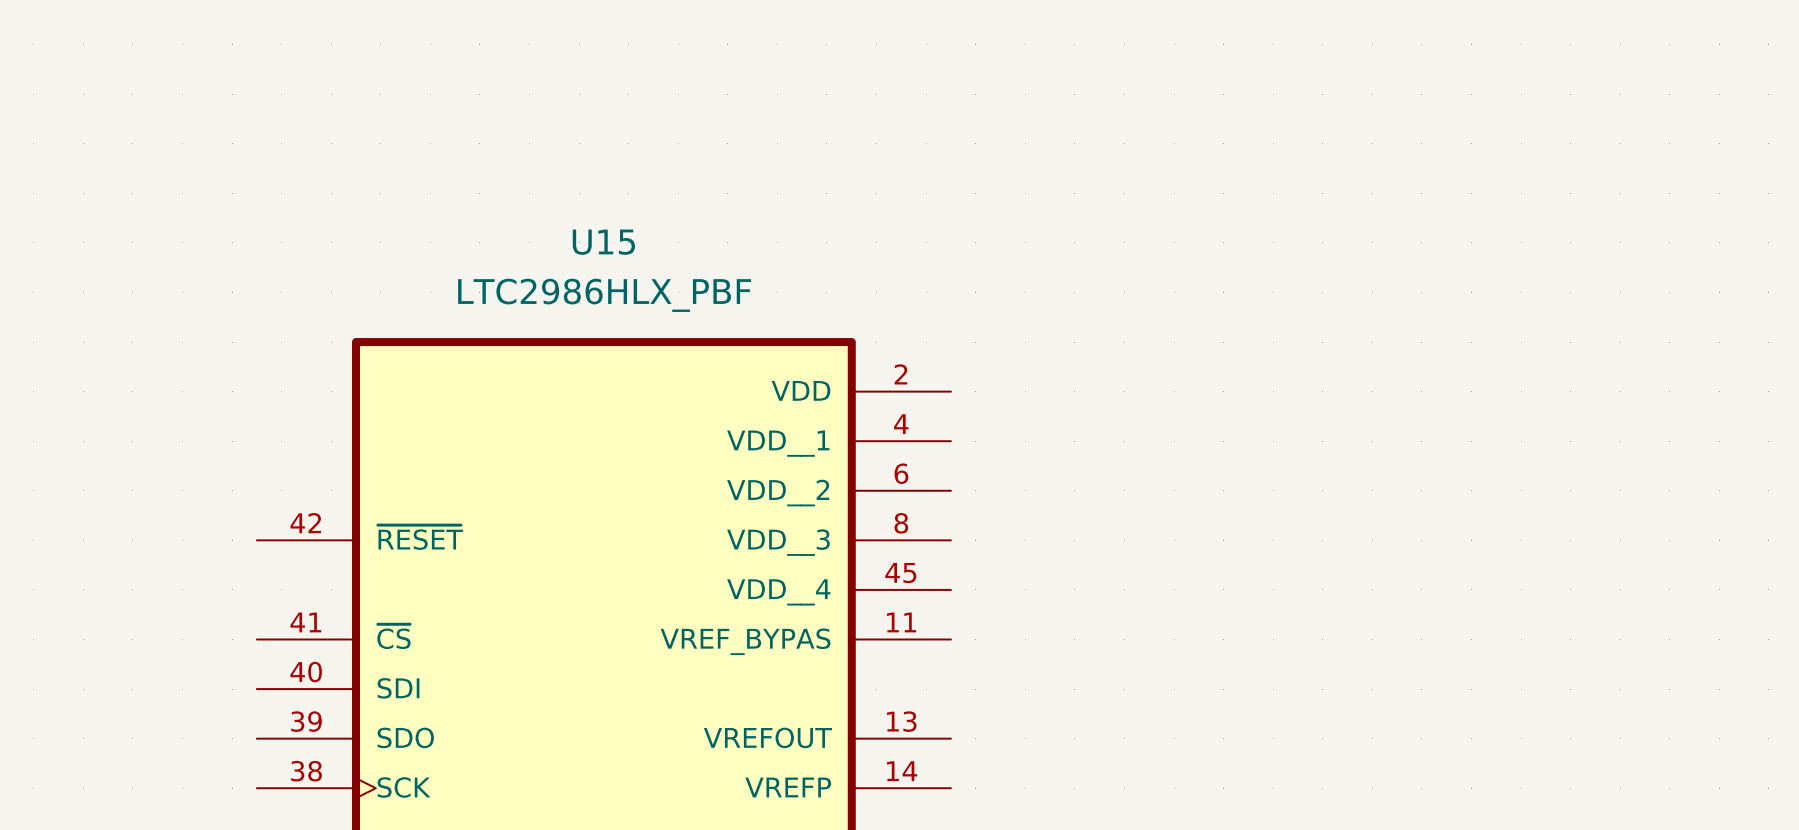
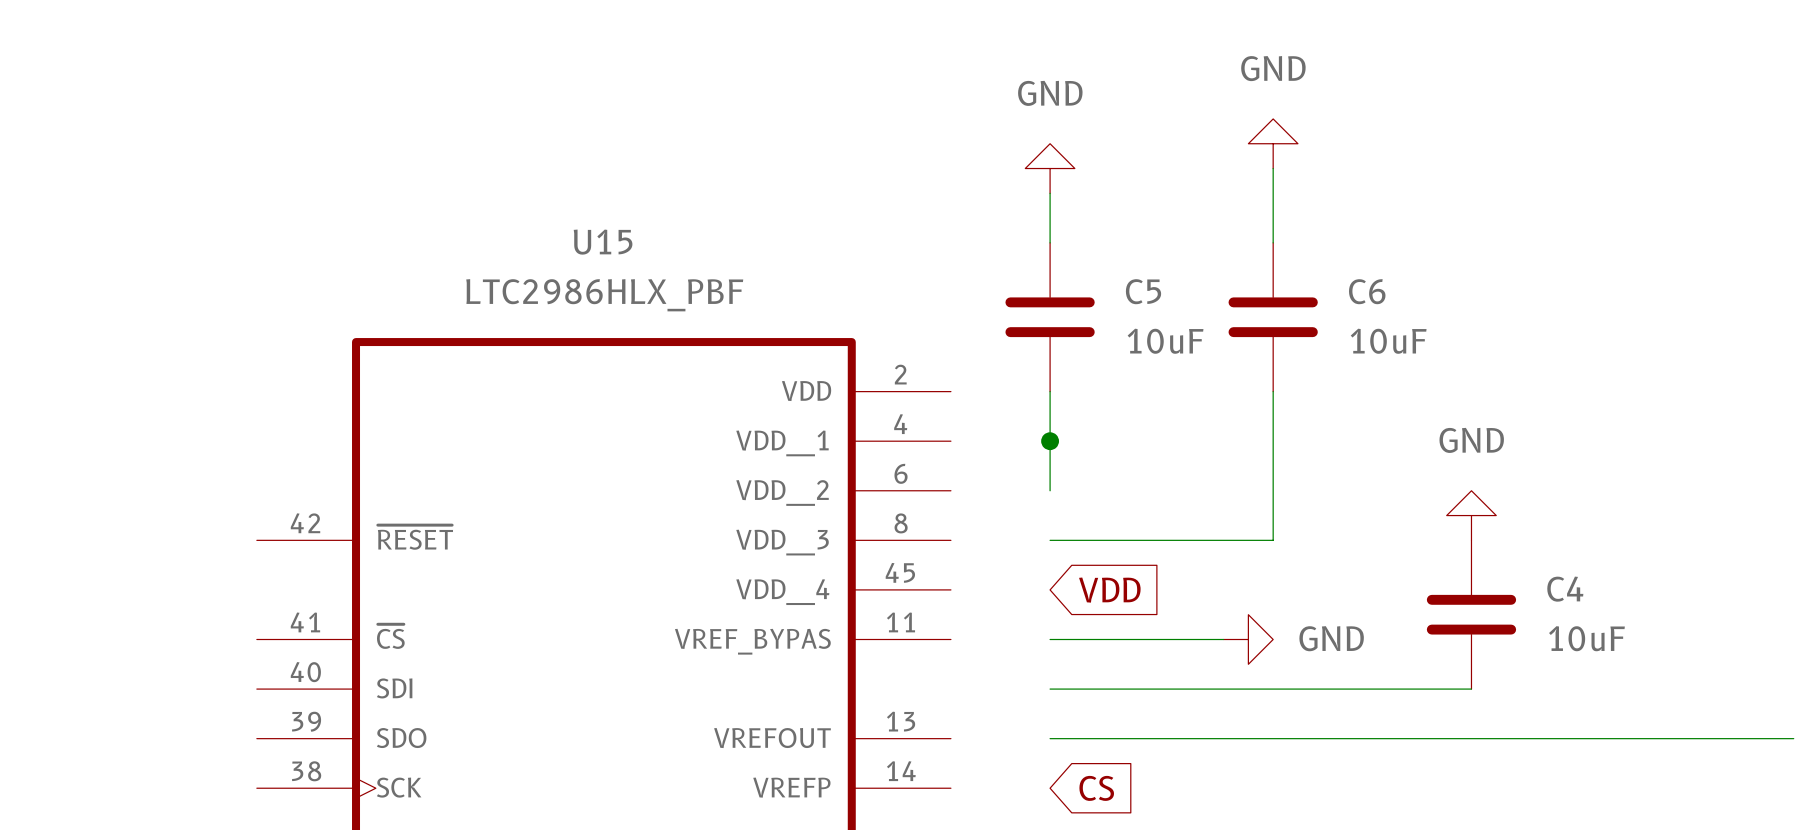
power symbol: none -> GND (1273, 143)
power symbol: none -> GND (1050, 168)
wire: none -> (1273, 168) (1273, 242)
wire: none -> (1050, 193) (1050, 242)
C5: none -> 10uF (1050, 317)
C6: none -> 10uF (1273, 317)
wire: none -> (1050, 391) (1050, 490)
wire: none -> (1273, 391) (1273, 540) (1050, 540)
junction: none -> (1050, 441)
power symbol: none -> GND (1471, 515)
global label: none -> VDD (1109, 590)
C4: none -> 10uF (1471, 614)
wire: none -> (1050, 639) (1223, 639)
power symbol: none -> GND (1248, 639)
wire: none -> (1050, 689) (1471, 689)
wire: none -> (1050, 738) (1793, 738)
global label: none -> CS (1096, 788)

